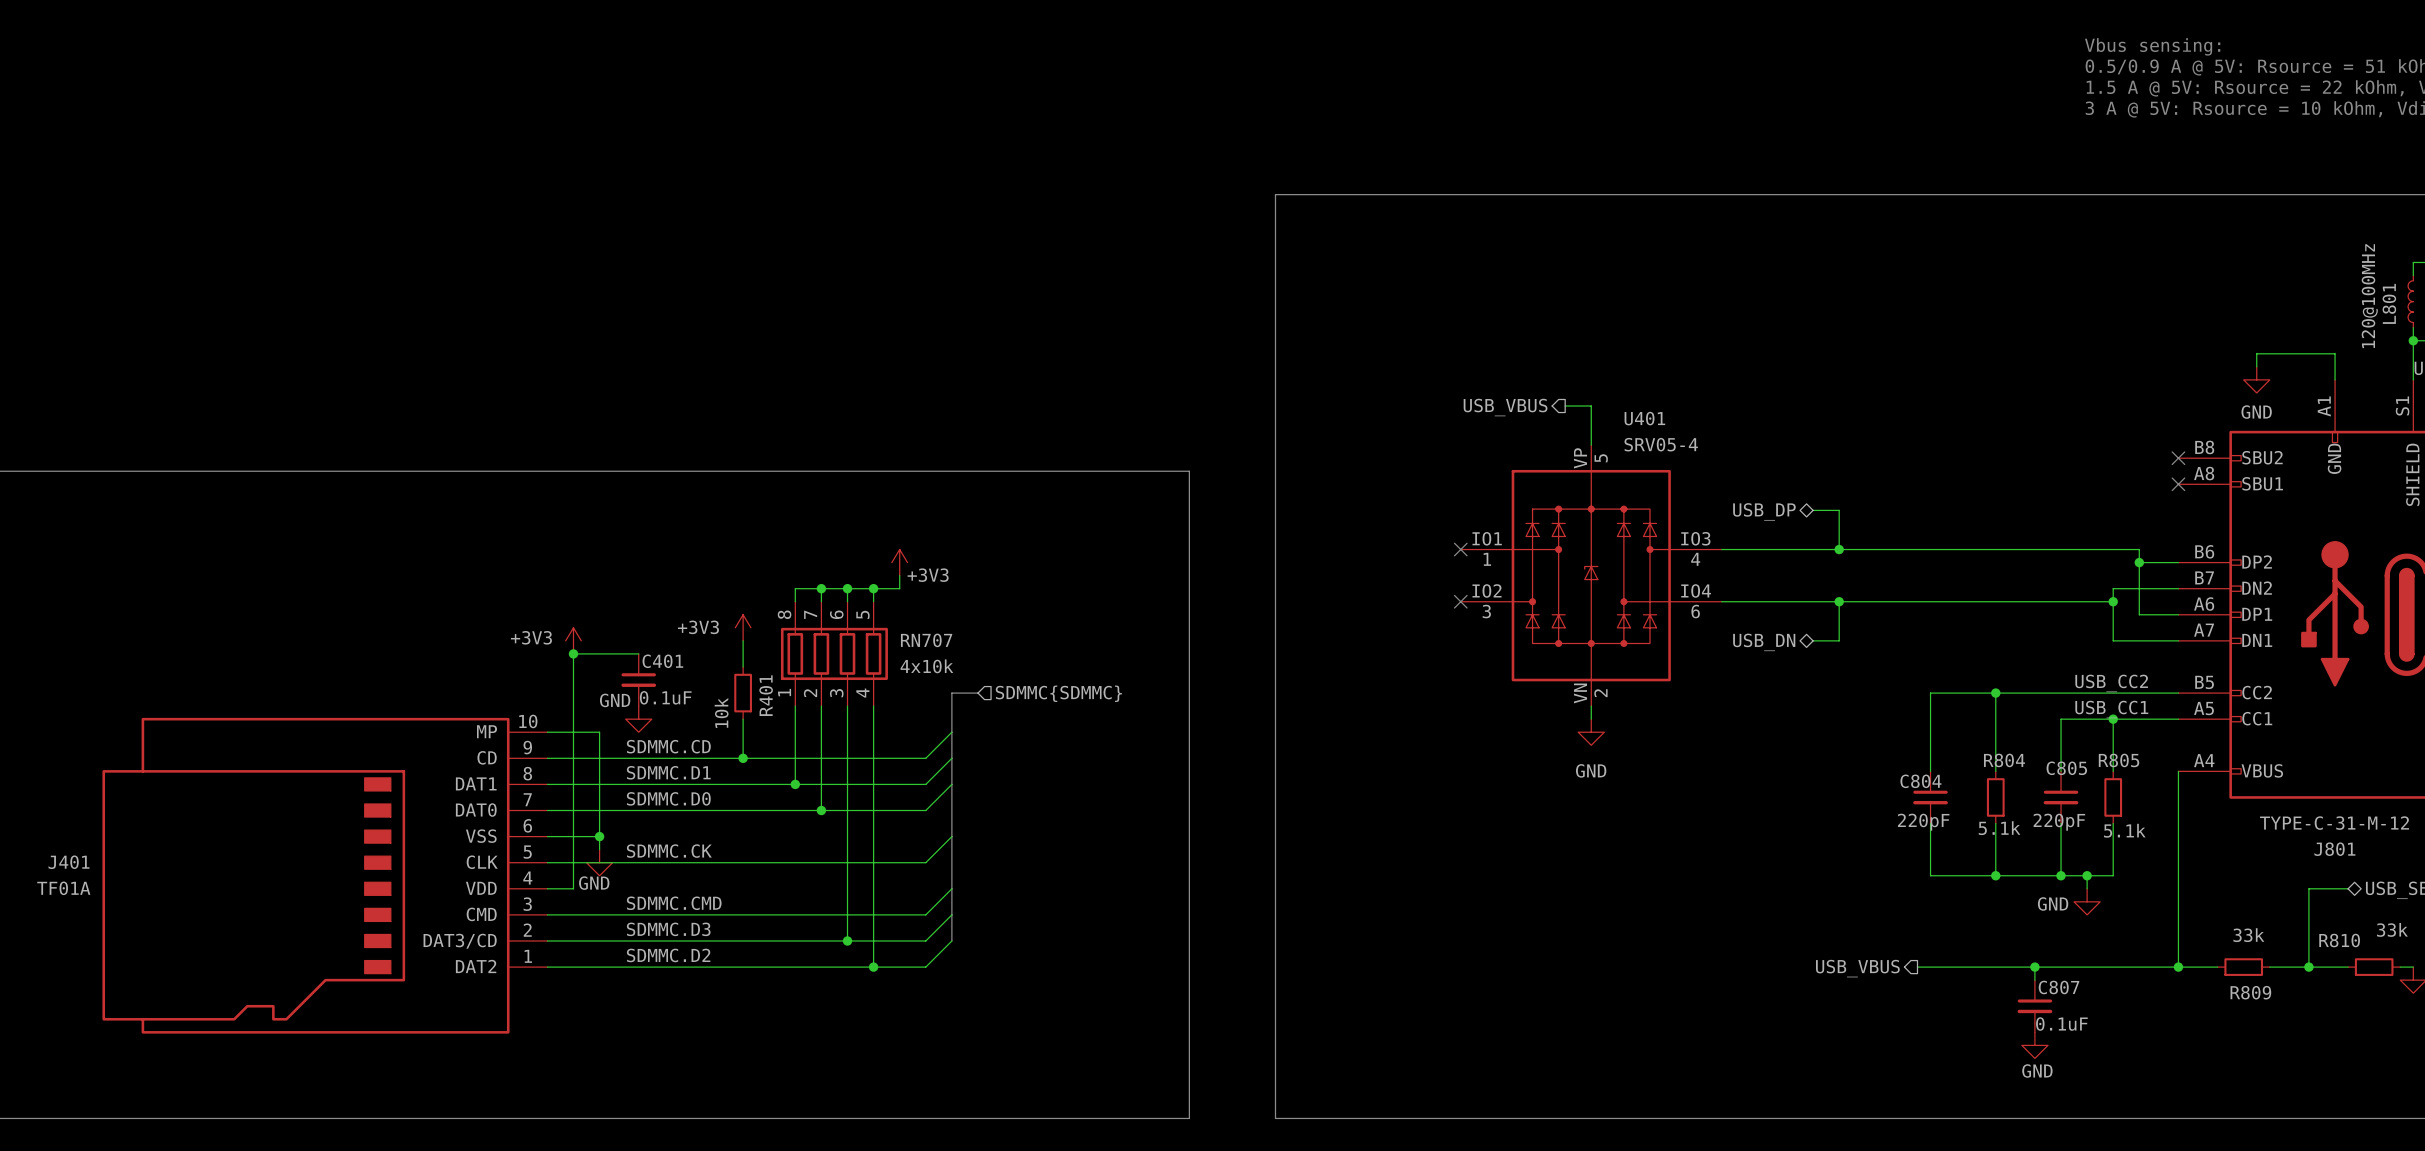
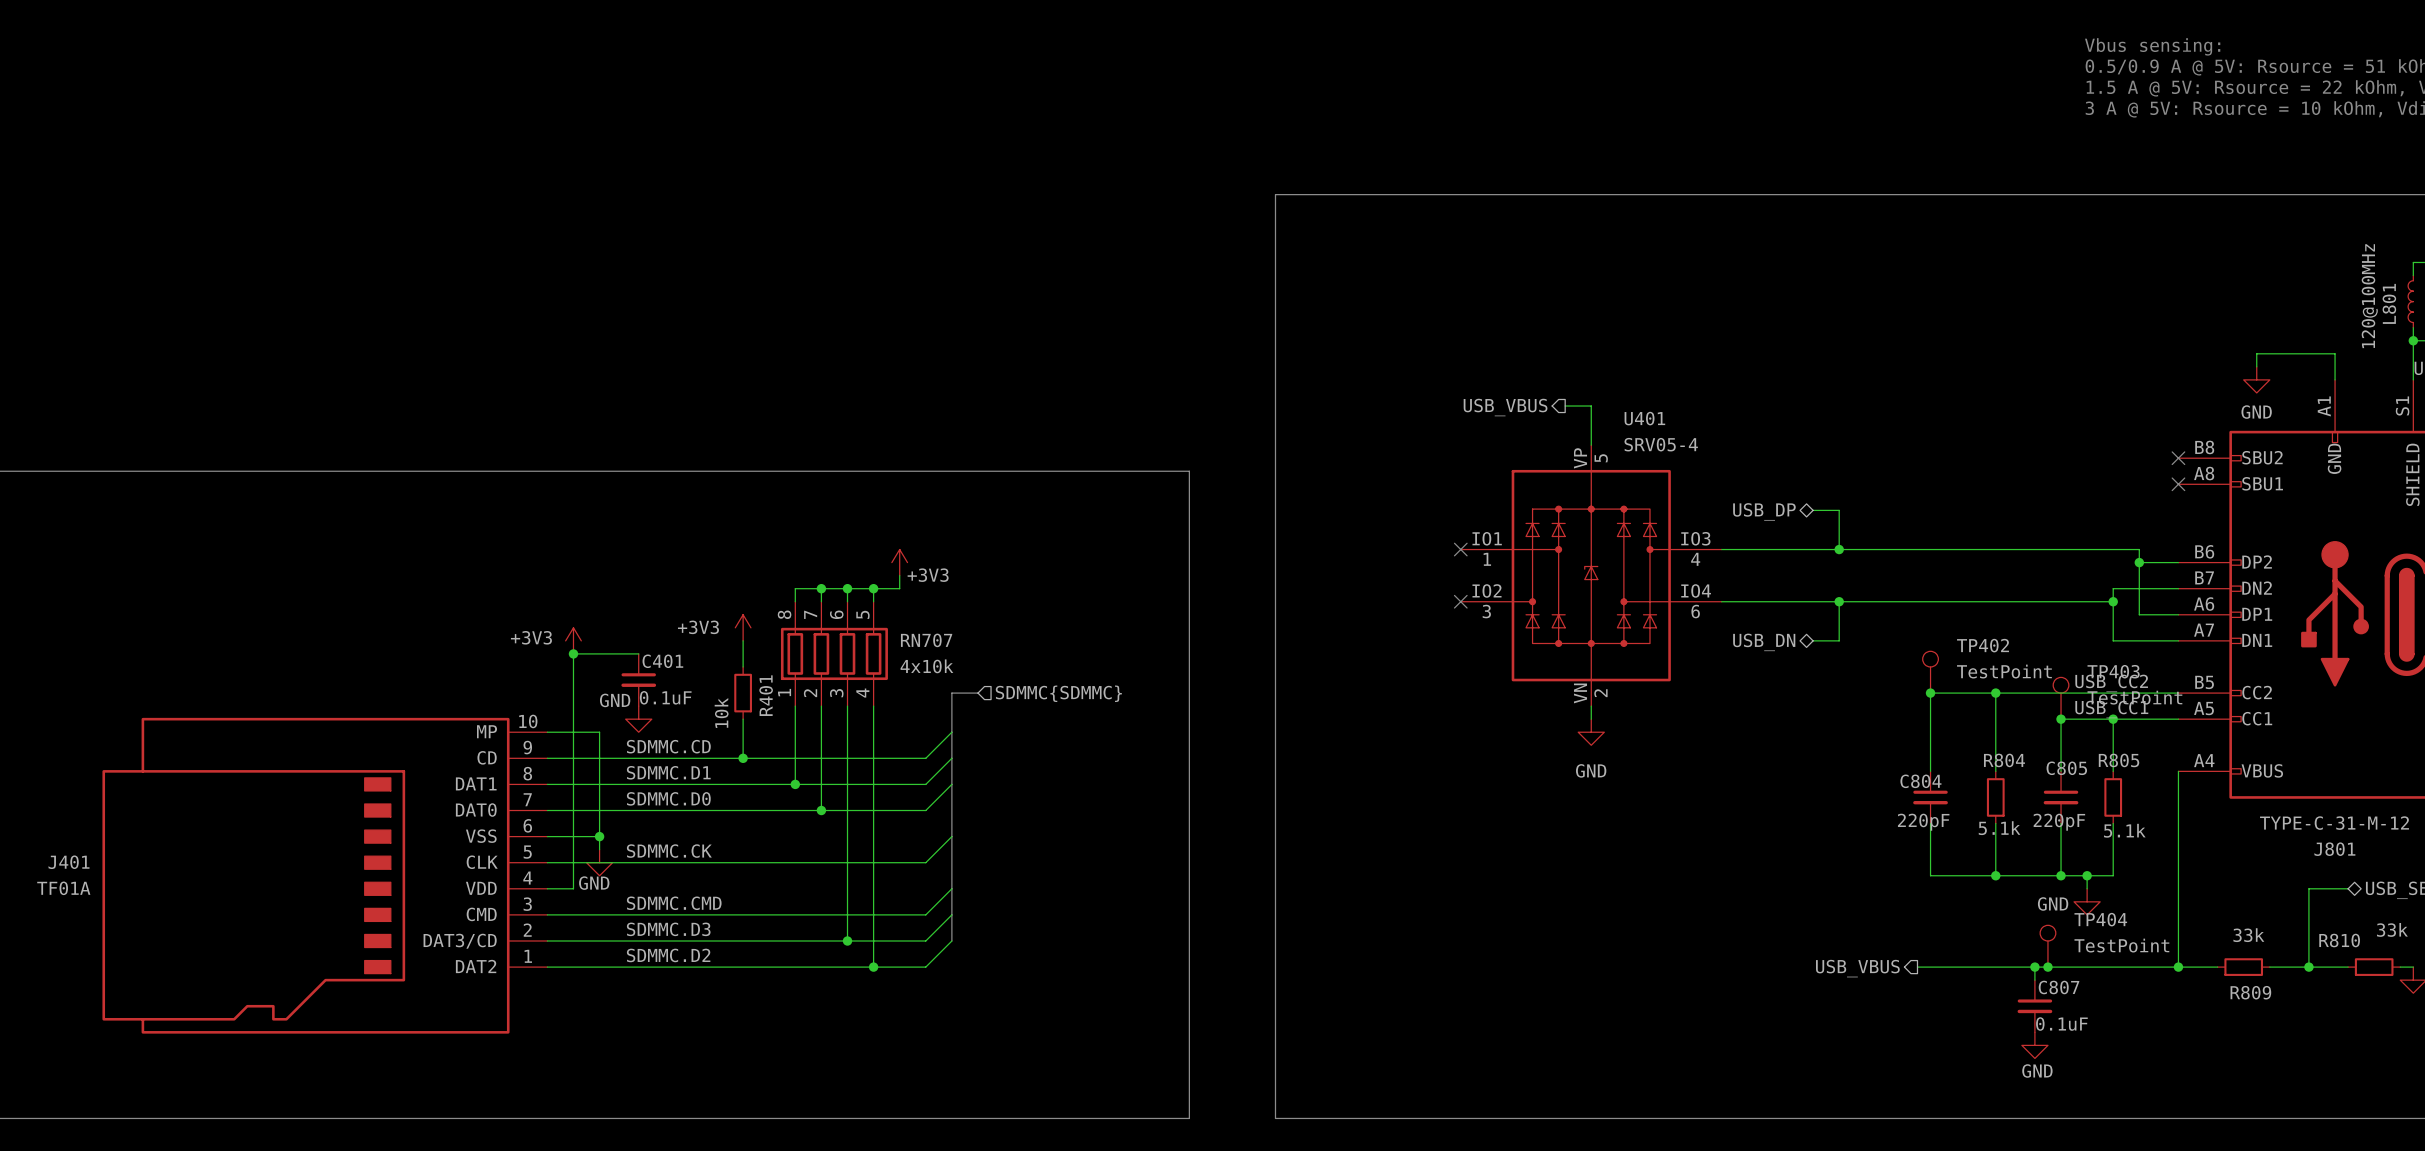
TP402: none -> TestPoint (1930, 672)
junction: none -> (1930, 693)
TP403: none -> TestPoint (2061, 698)
junction: none -> (2061, 719)
TP404: none -> TestPoint (2047, 946)
junction: none -> (2047, 967)

